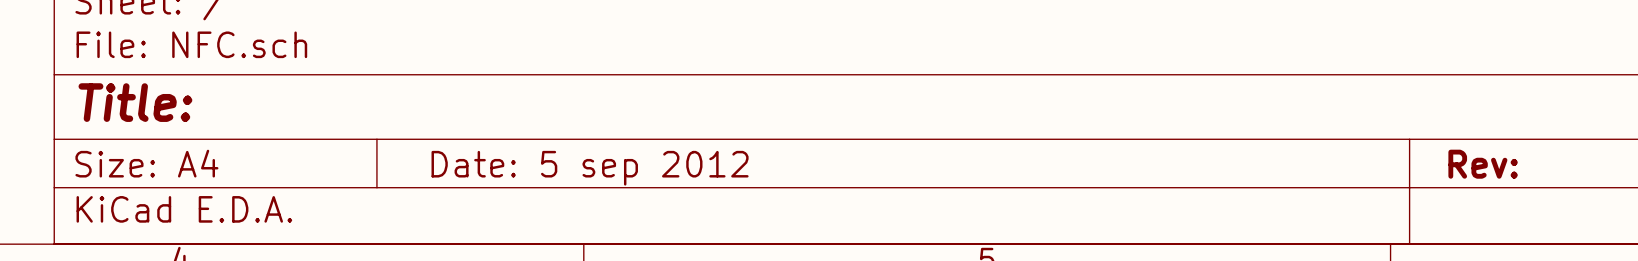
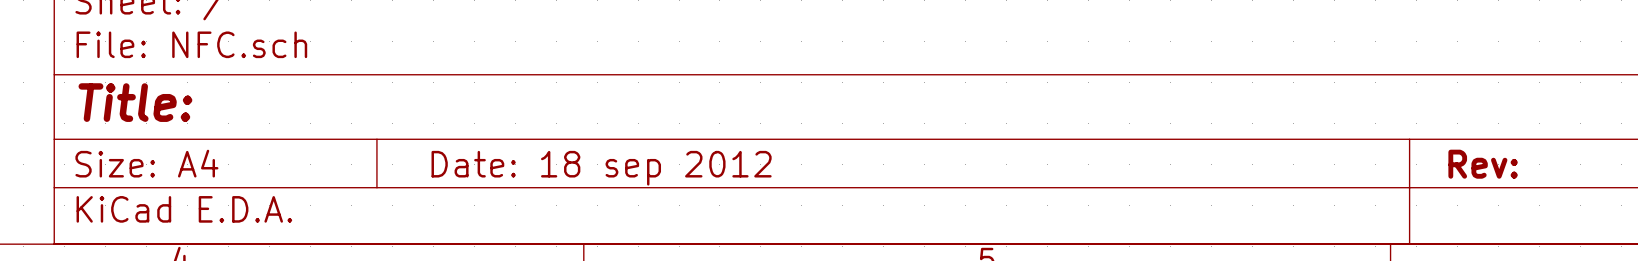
title block: Date: 5 sep 2012 (590, 168) -> Date: 18 sep 2012 (601, 168)

